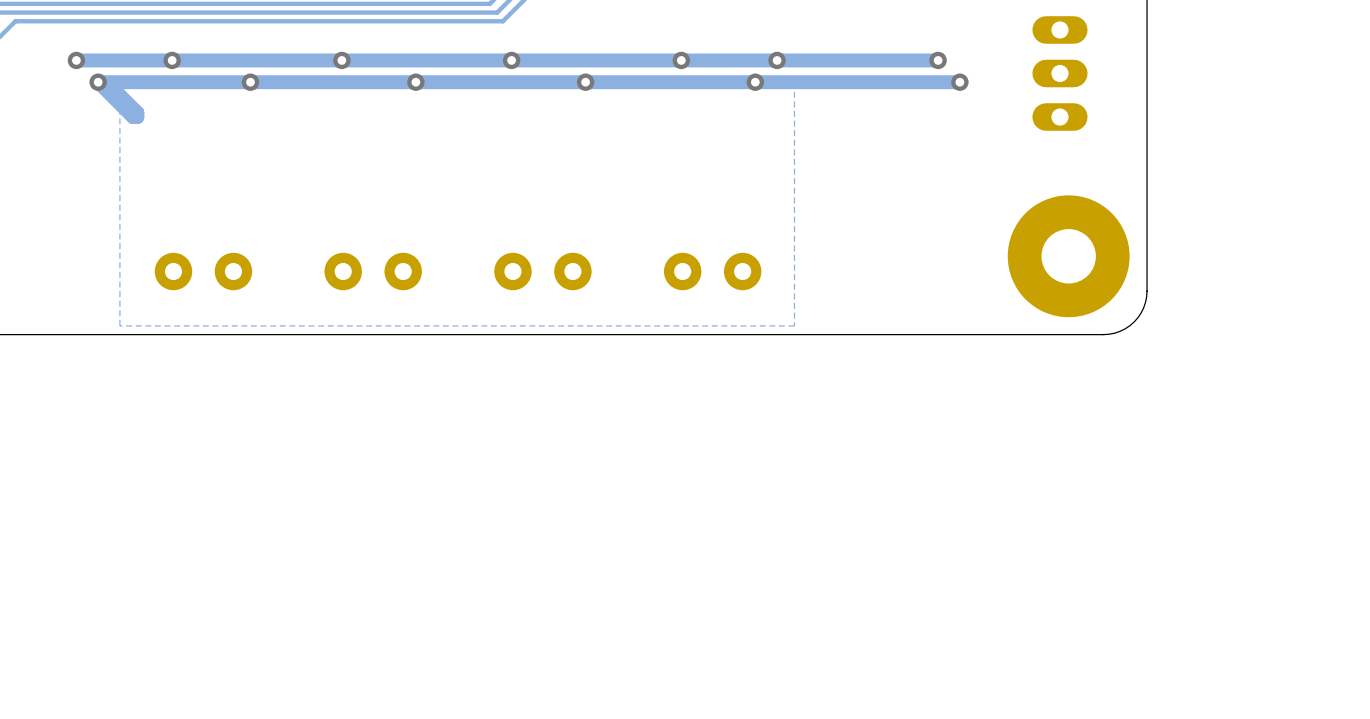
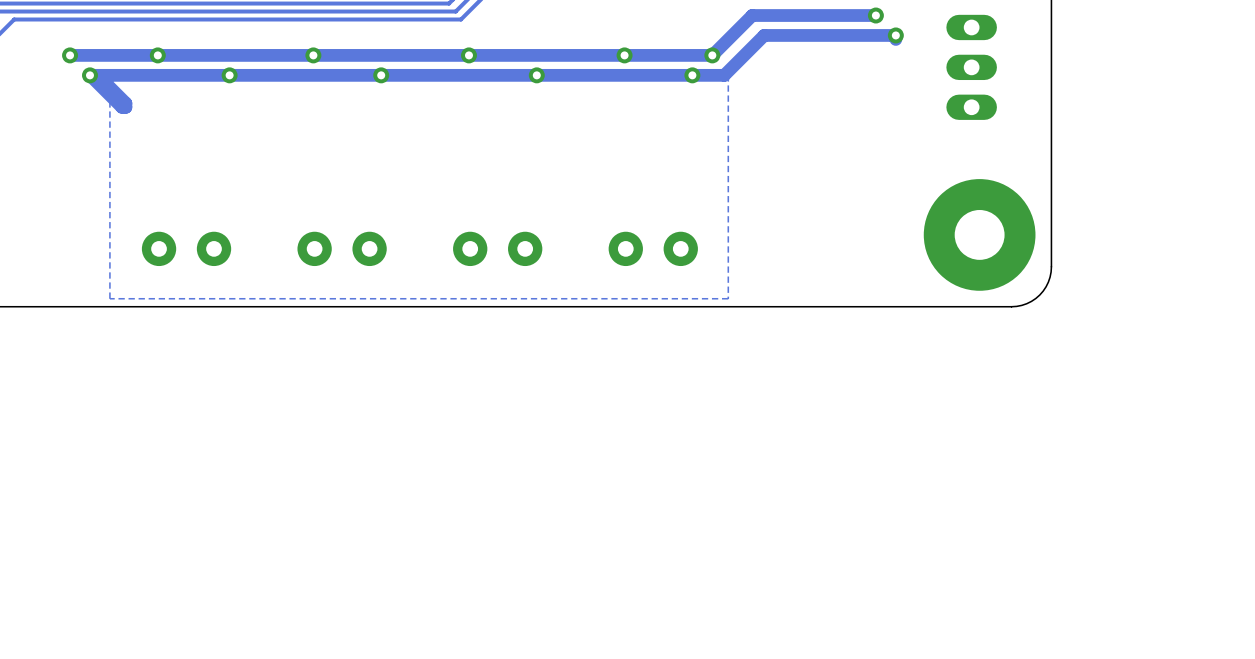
via: none -> (875, 15)
via: none -> (895, 35)
track: (938, 60) (777, 60) -> (875, 15) (752, 15) (712, 55)
via: (938, 60) -> none
track: (959, 82) (790, 82) -> (895, 39) (895, 35) (764, 35) (724, 75)
via: (959, 82) -> none

